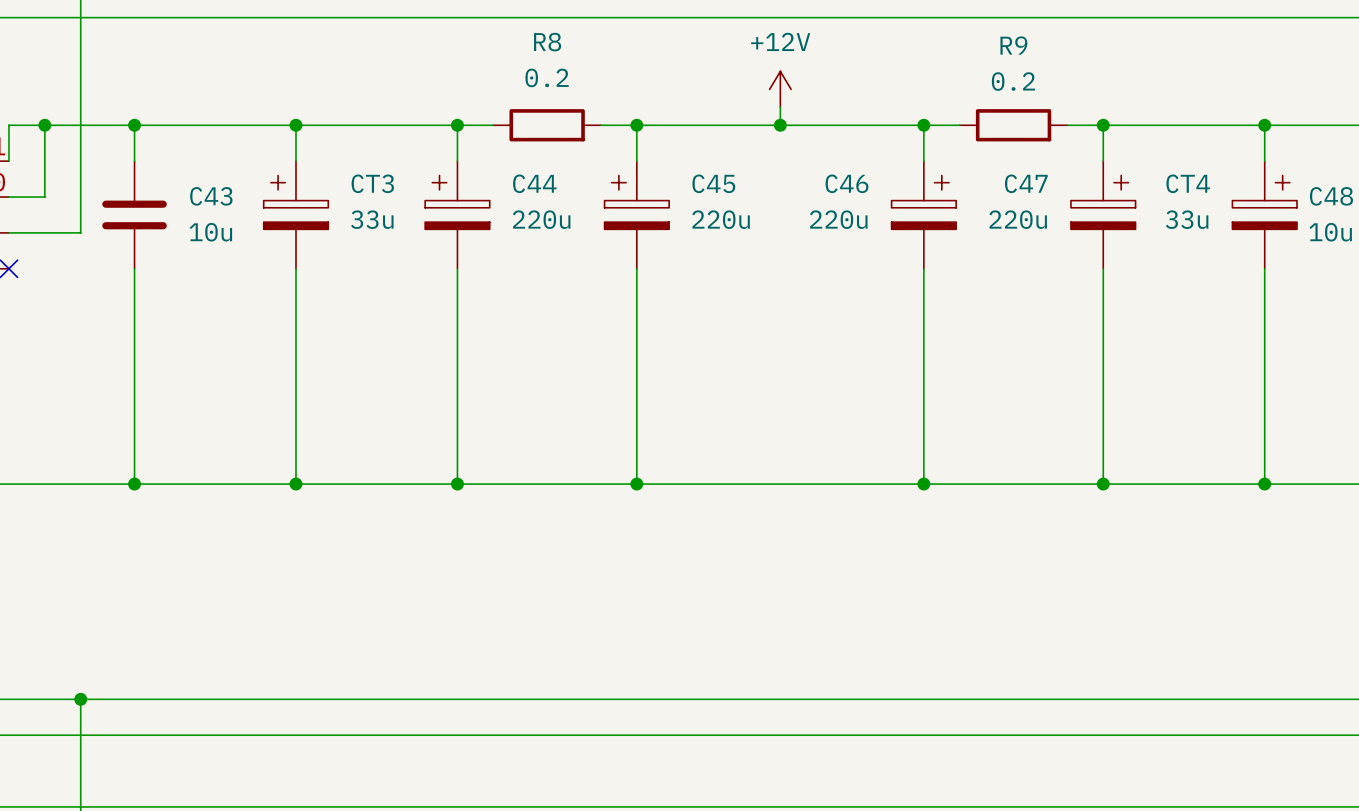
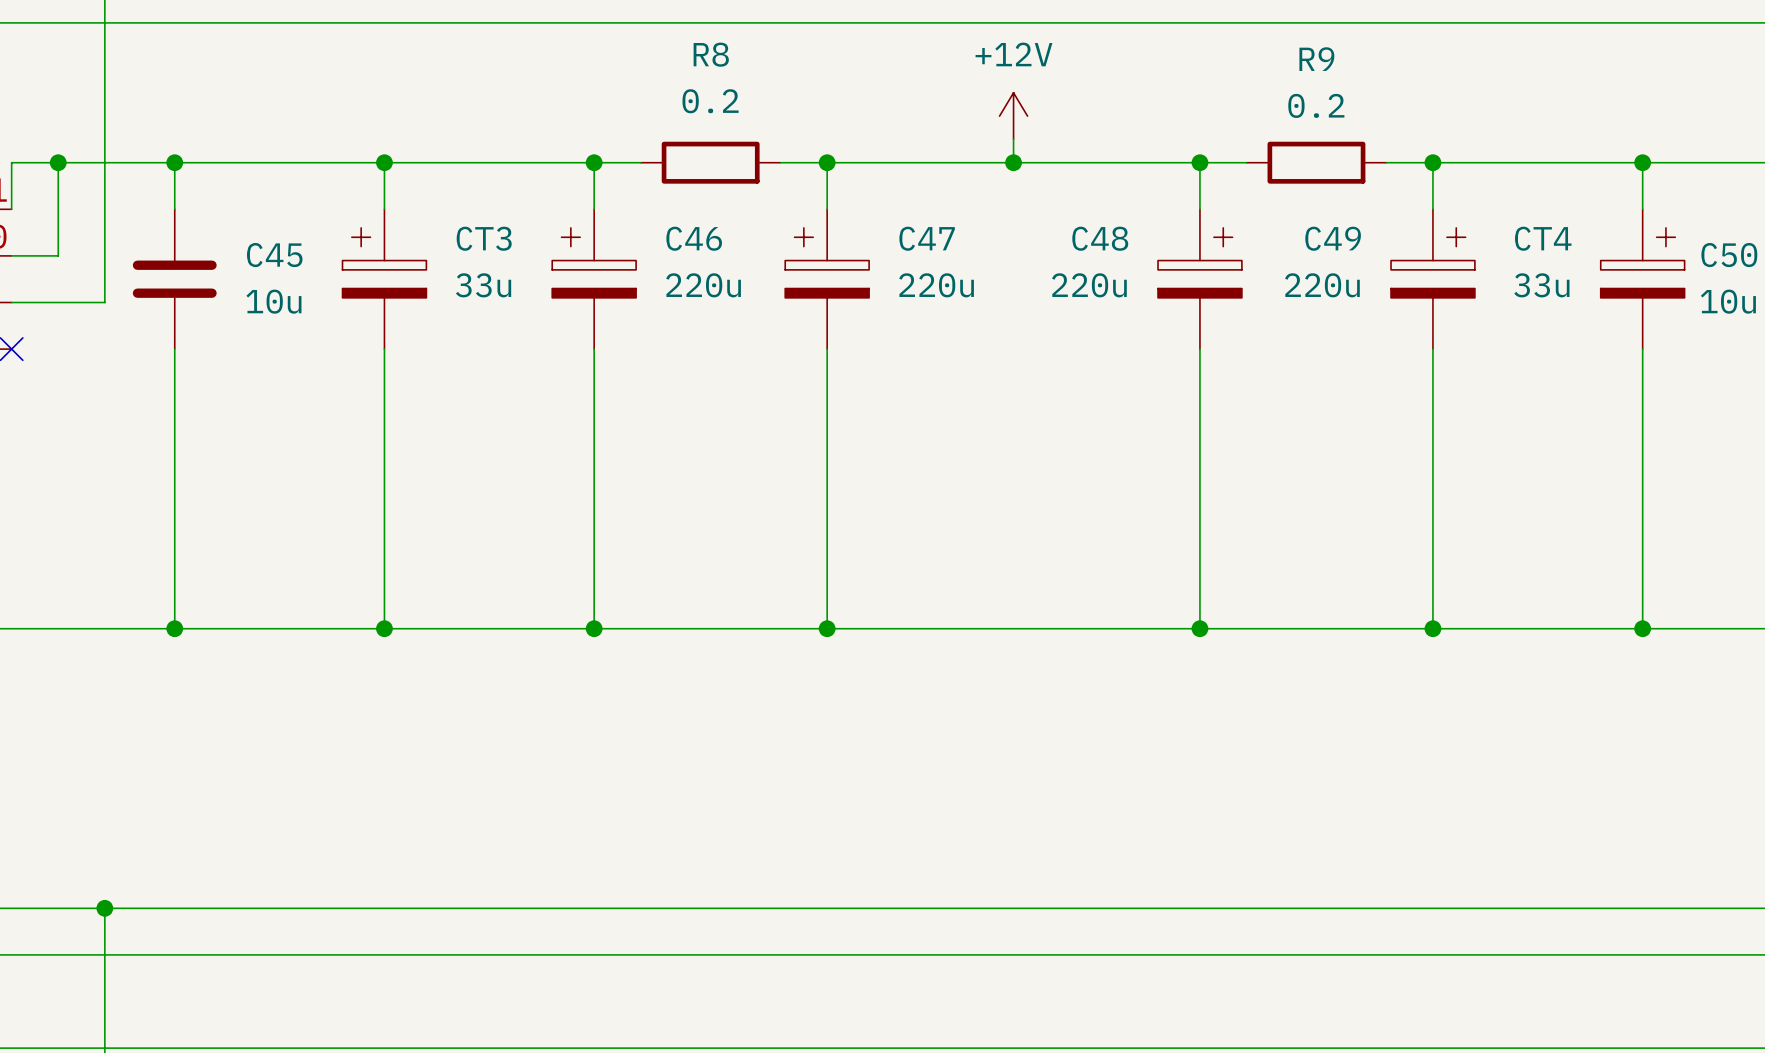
C44 name: C44 (534, 183) -> C46 (694, 238)
C45 name: C45 (713, 183) -> C47 (927, 238)
C46 name: C46 (846, 183) -> C48 (1100, 238)
C47 name: C47 (1026, 183) -> C49 (1333, 238)
C43 name: C43 (211, 196) -> C45 (274, 255)
C48 name: C48 (1331, 196) -> C50 (1729, 255)

